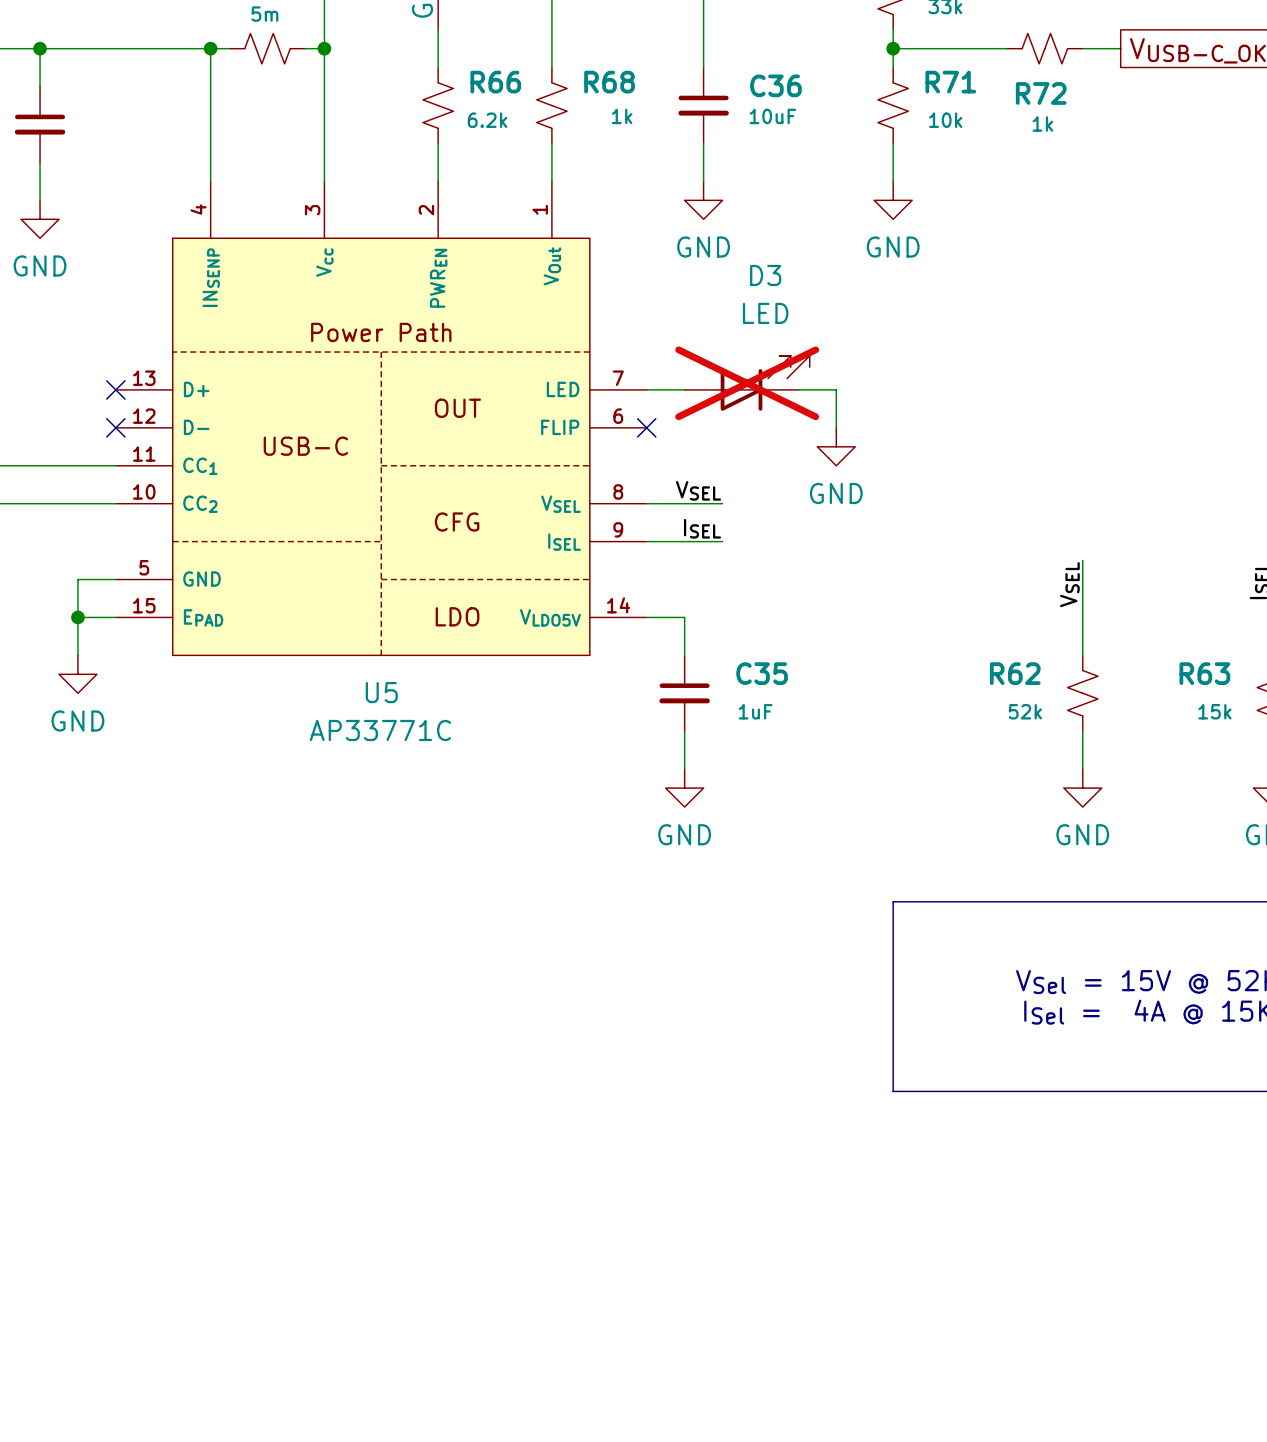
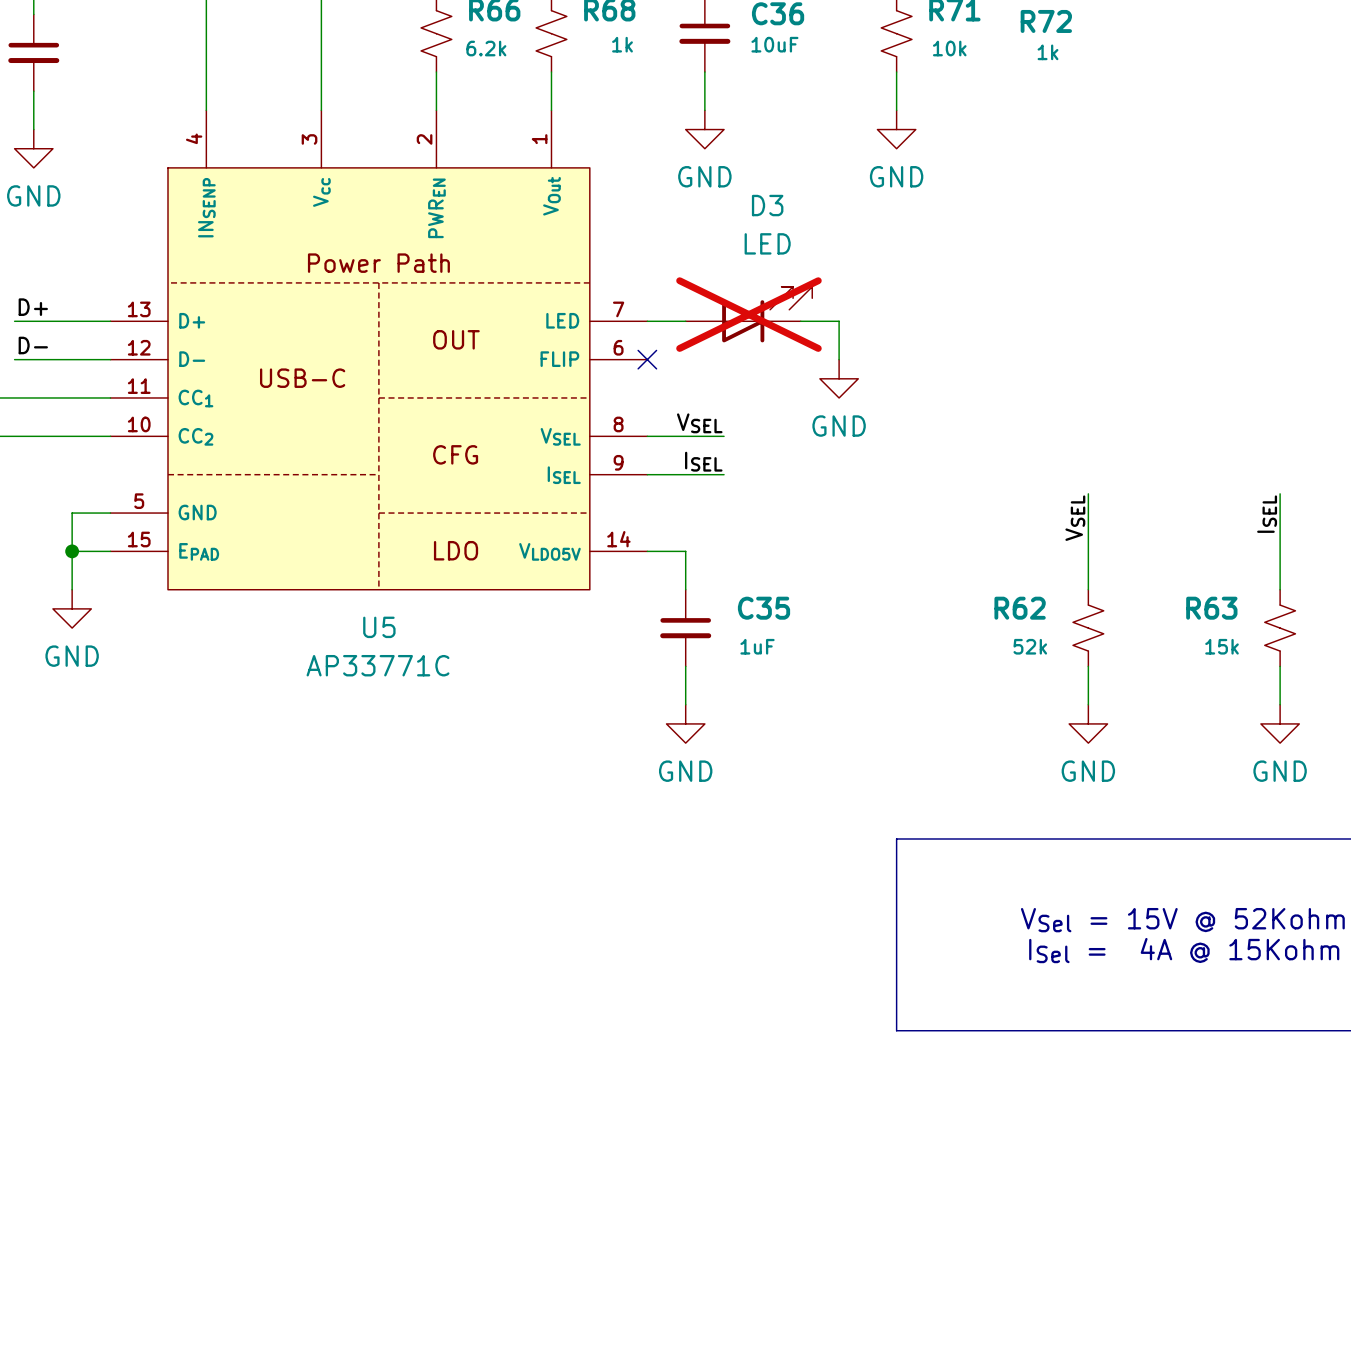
label: none -> D+ (33, 307)
wire: none -> (14, 321) (110, 321)
no-connect mark: (115, 389) -> none
label: none -> D- (33, 345)
wire: none -> (14, 359) (110, 359)
no-connect mark: (115, 427) -> none

